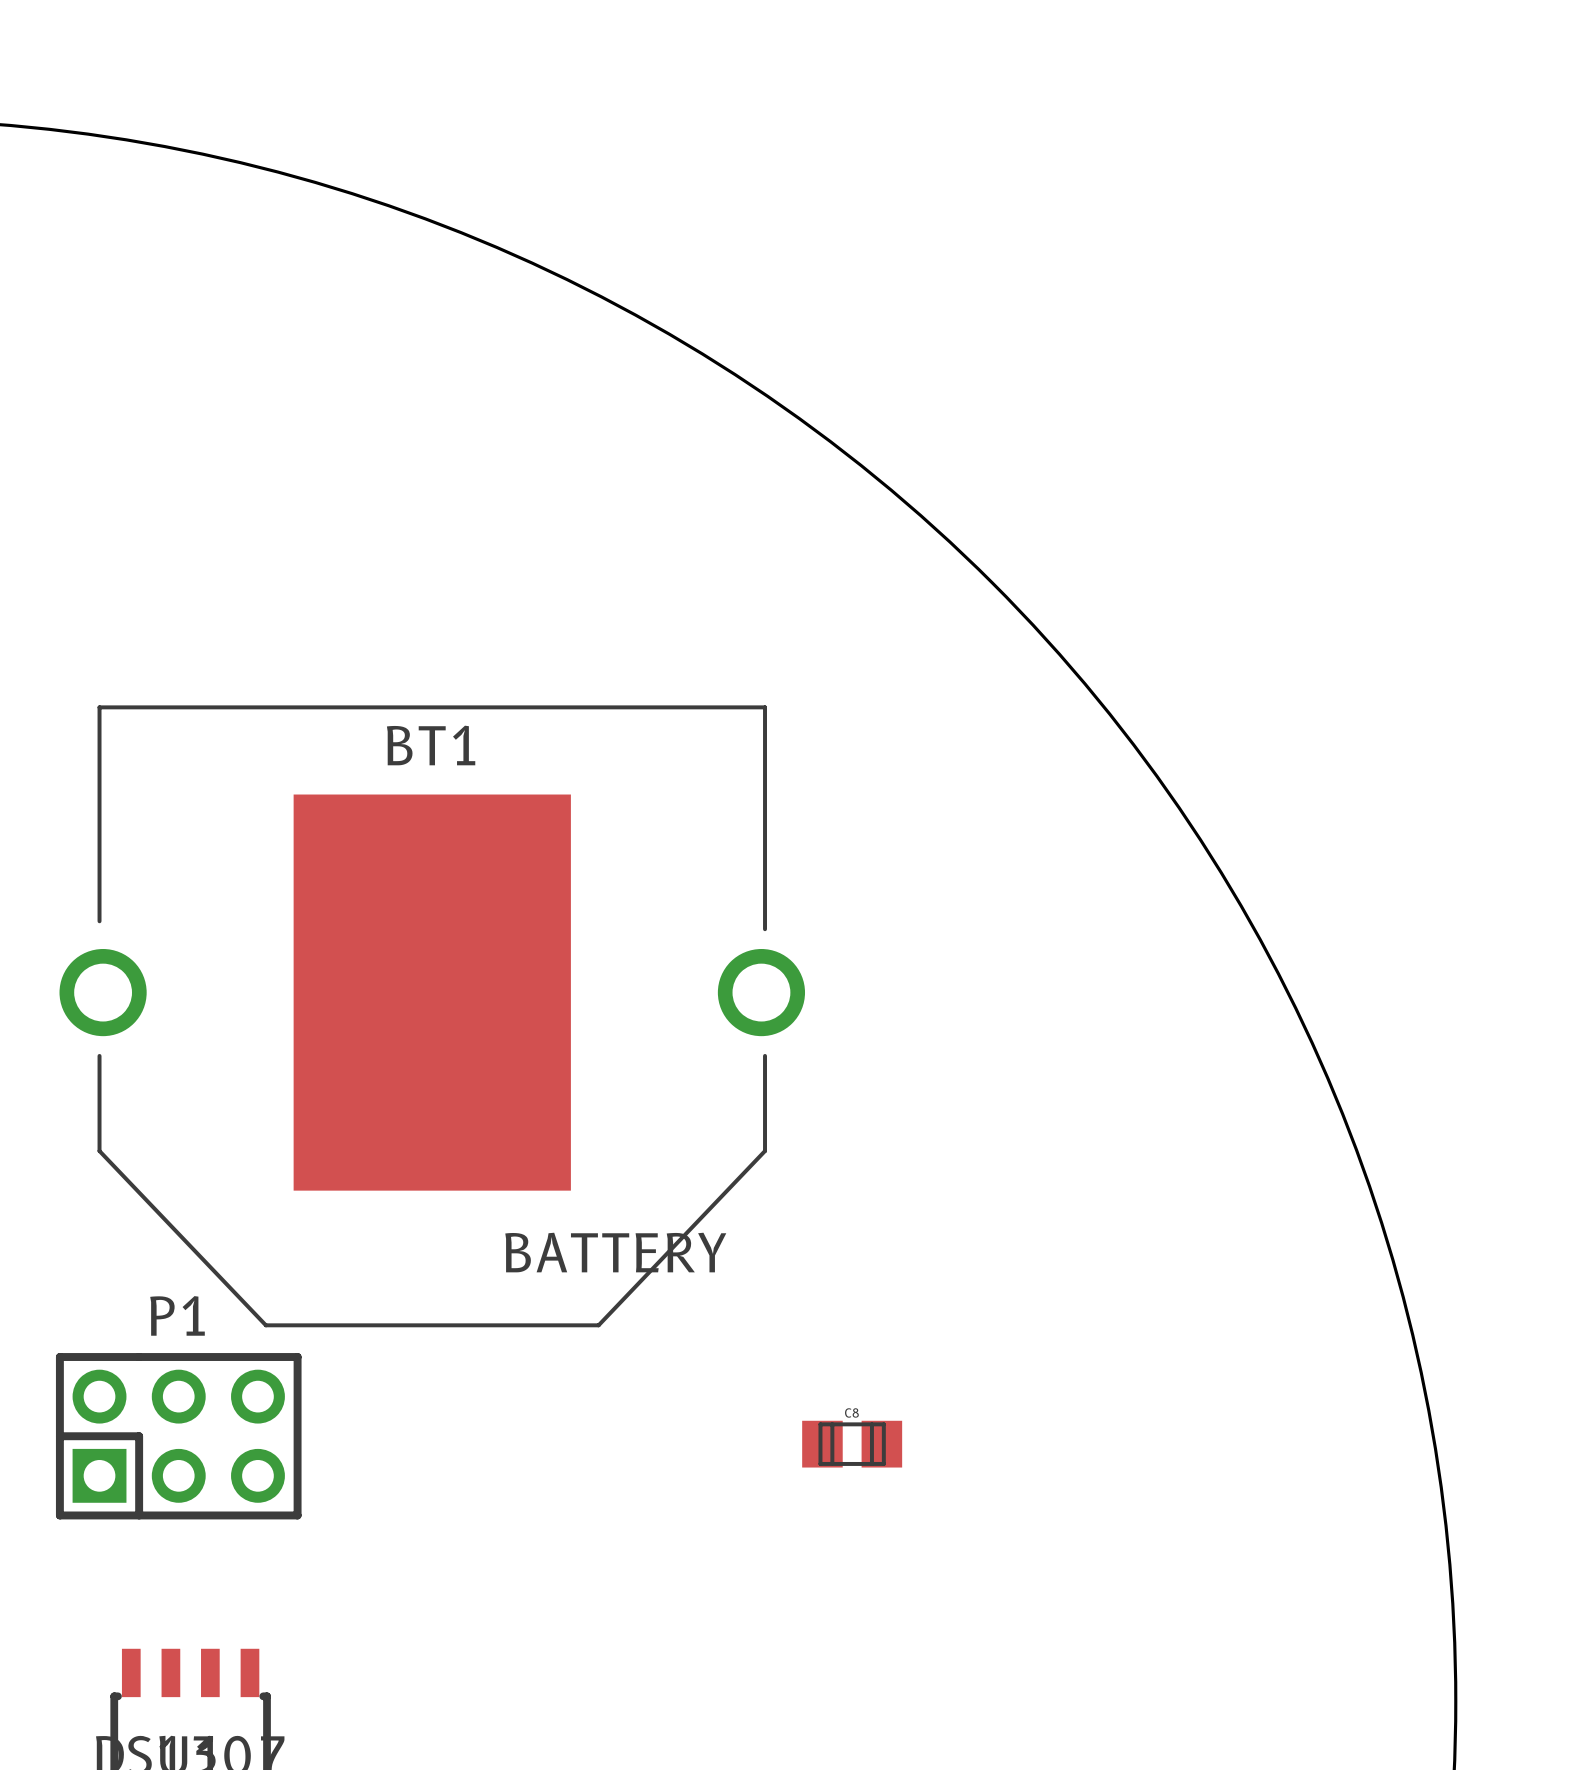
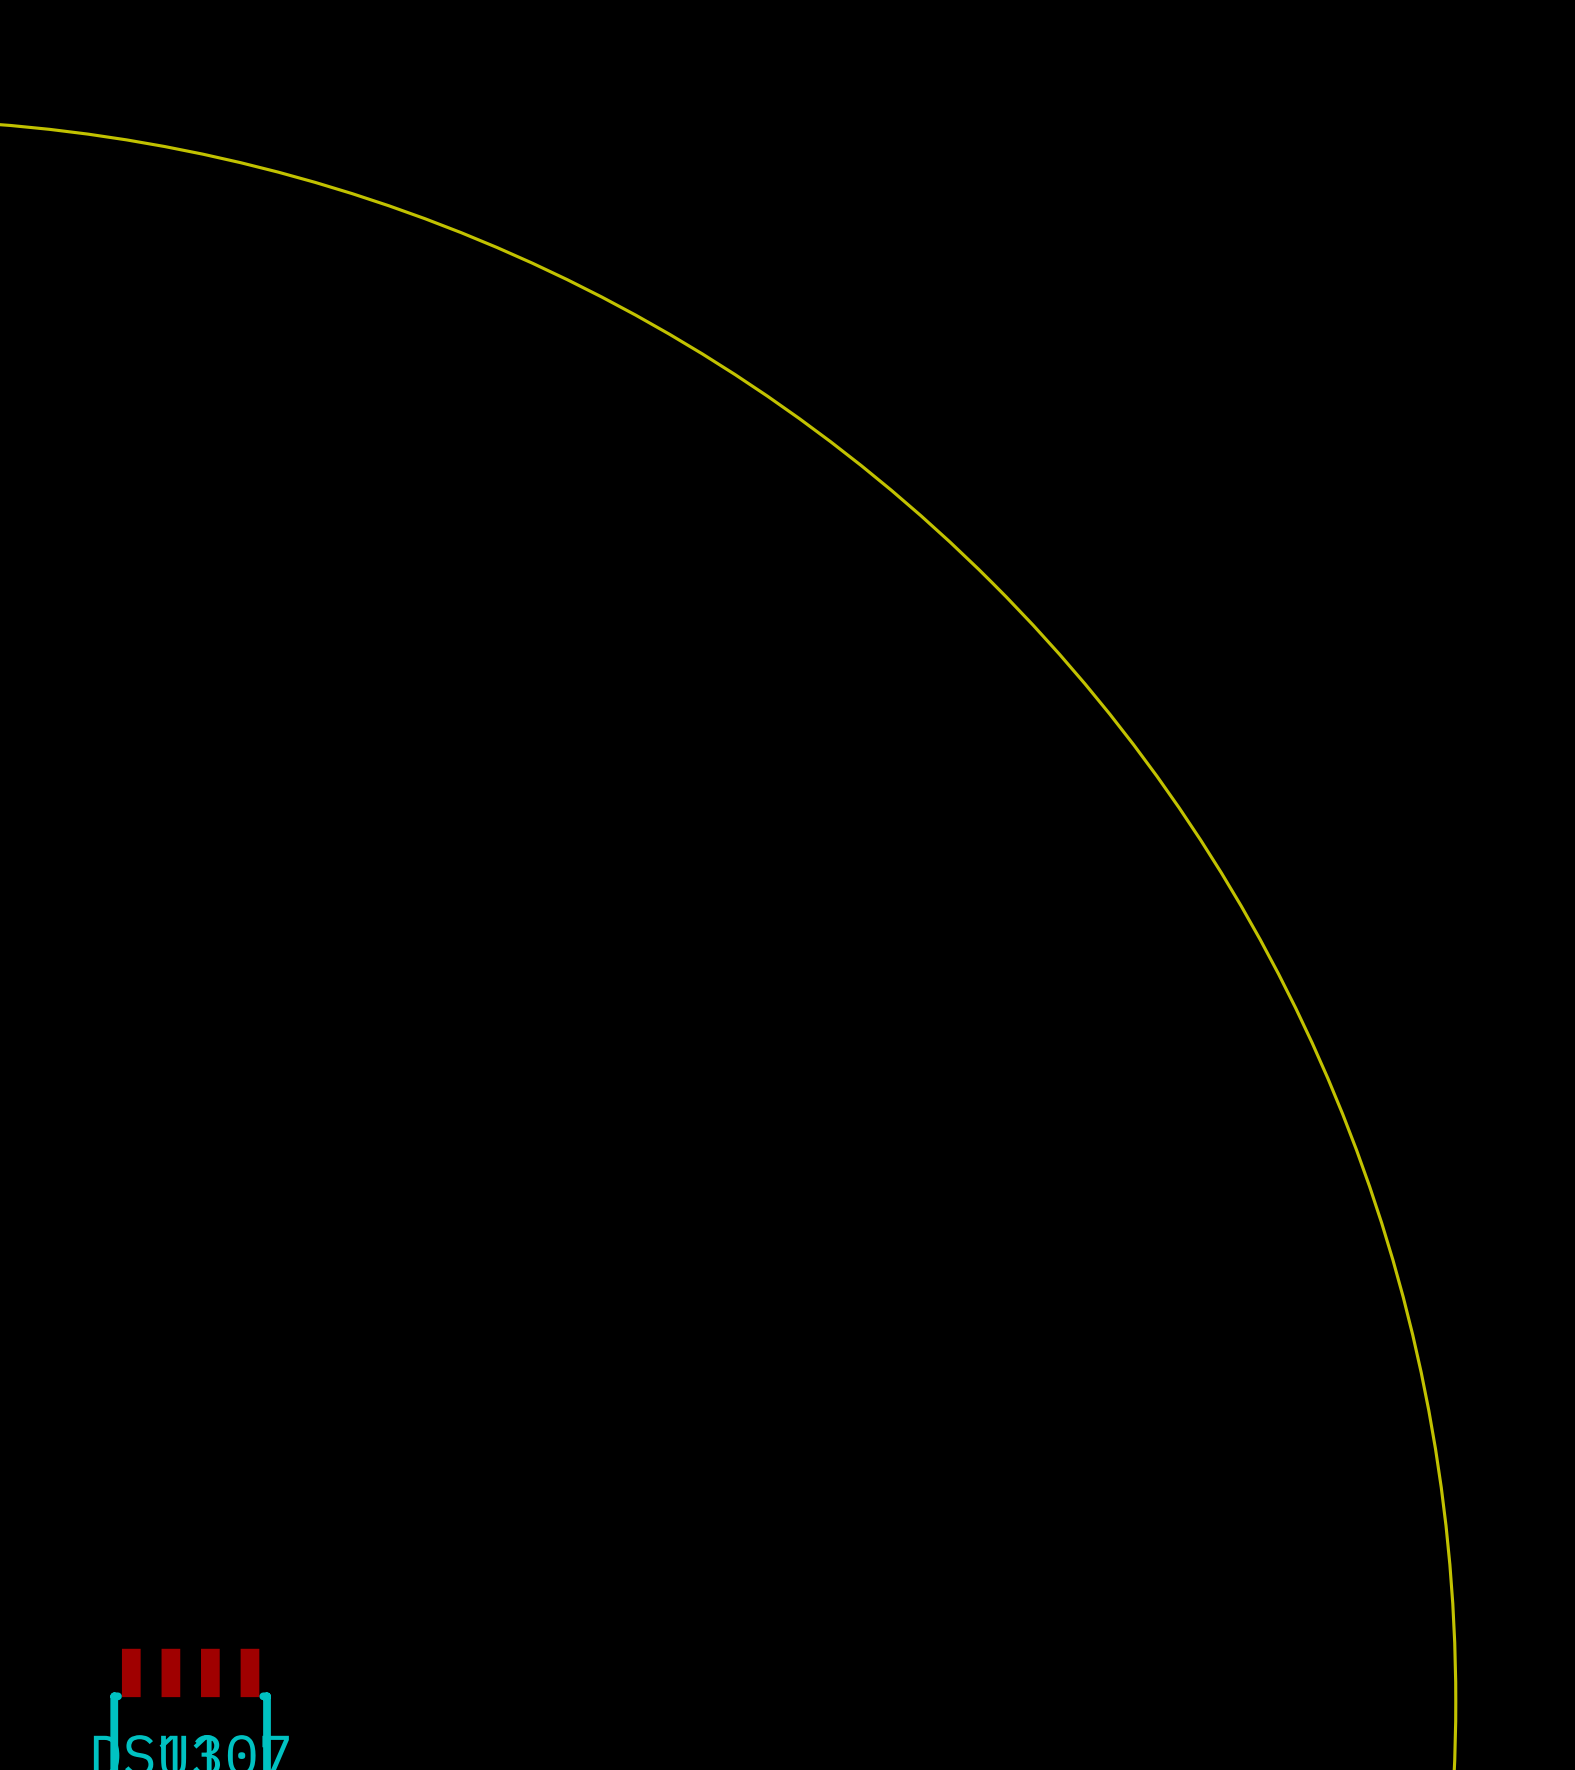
BT1: BATTERY (432, 1016) -> none
P1: (178, 1436) -> none
C8: (852, 1444) -> none

